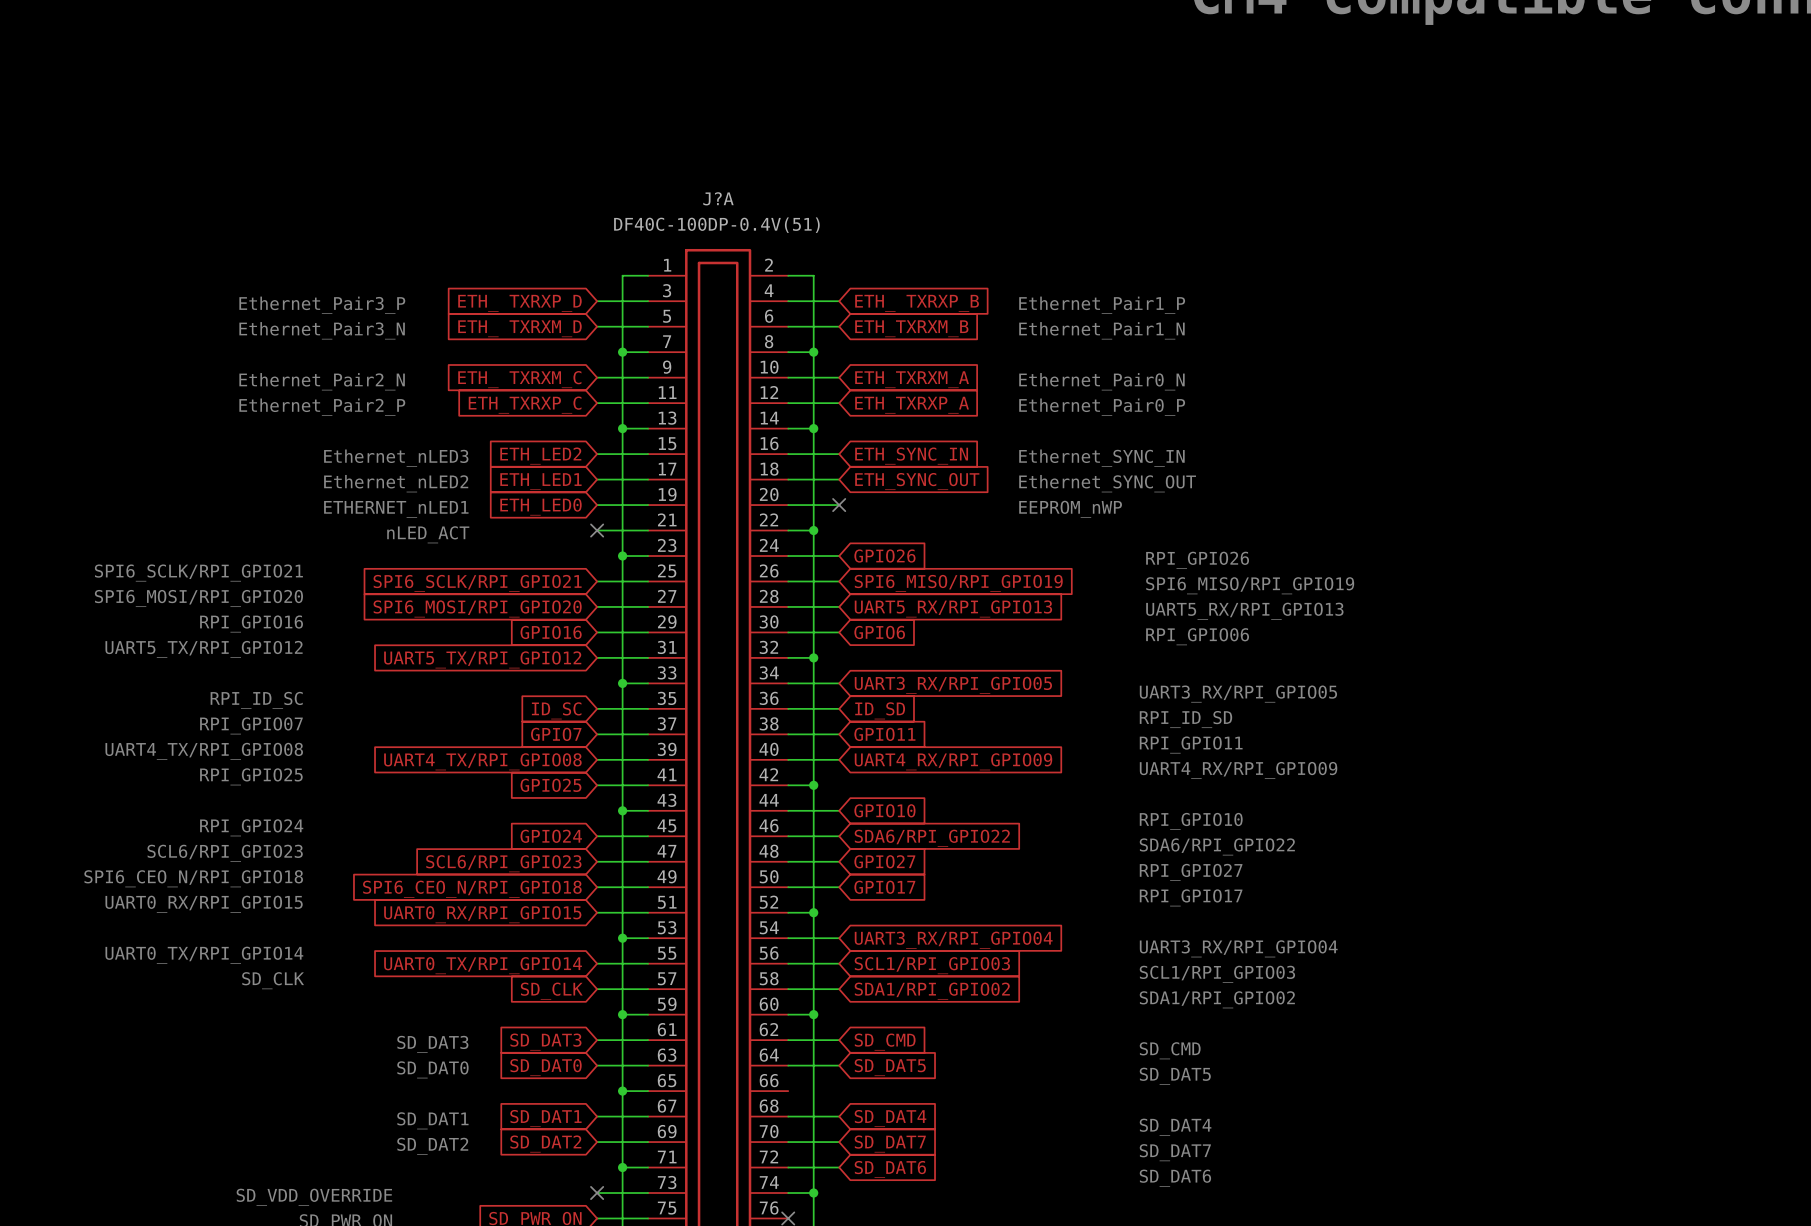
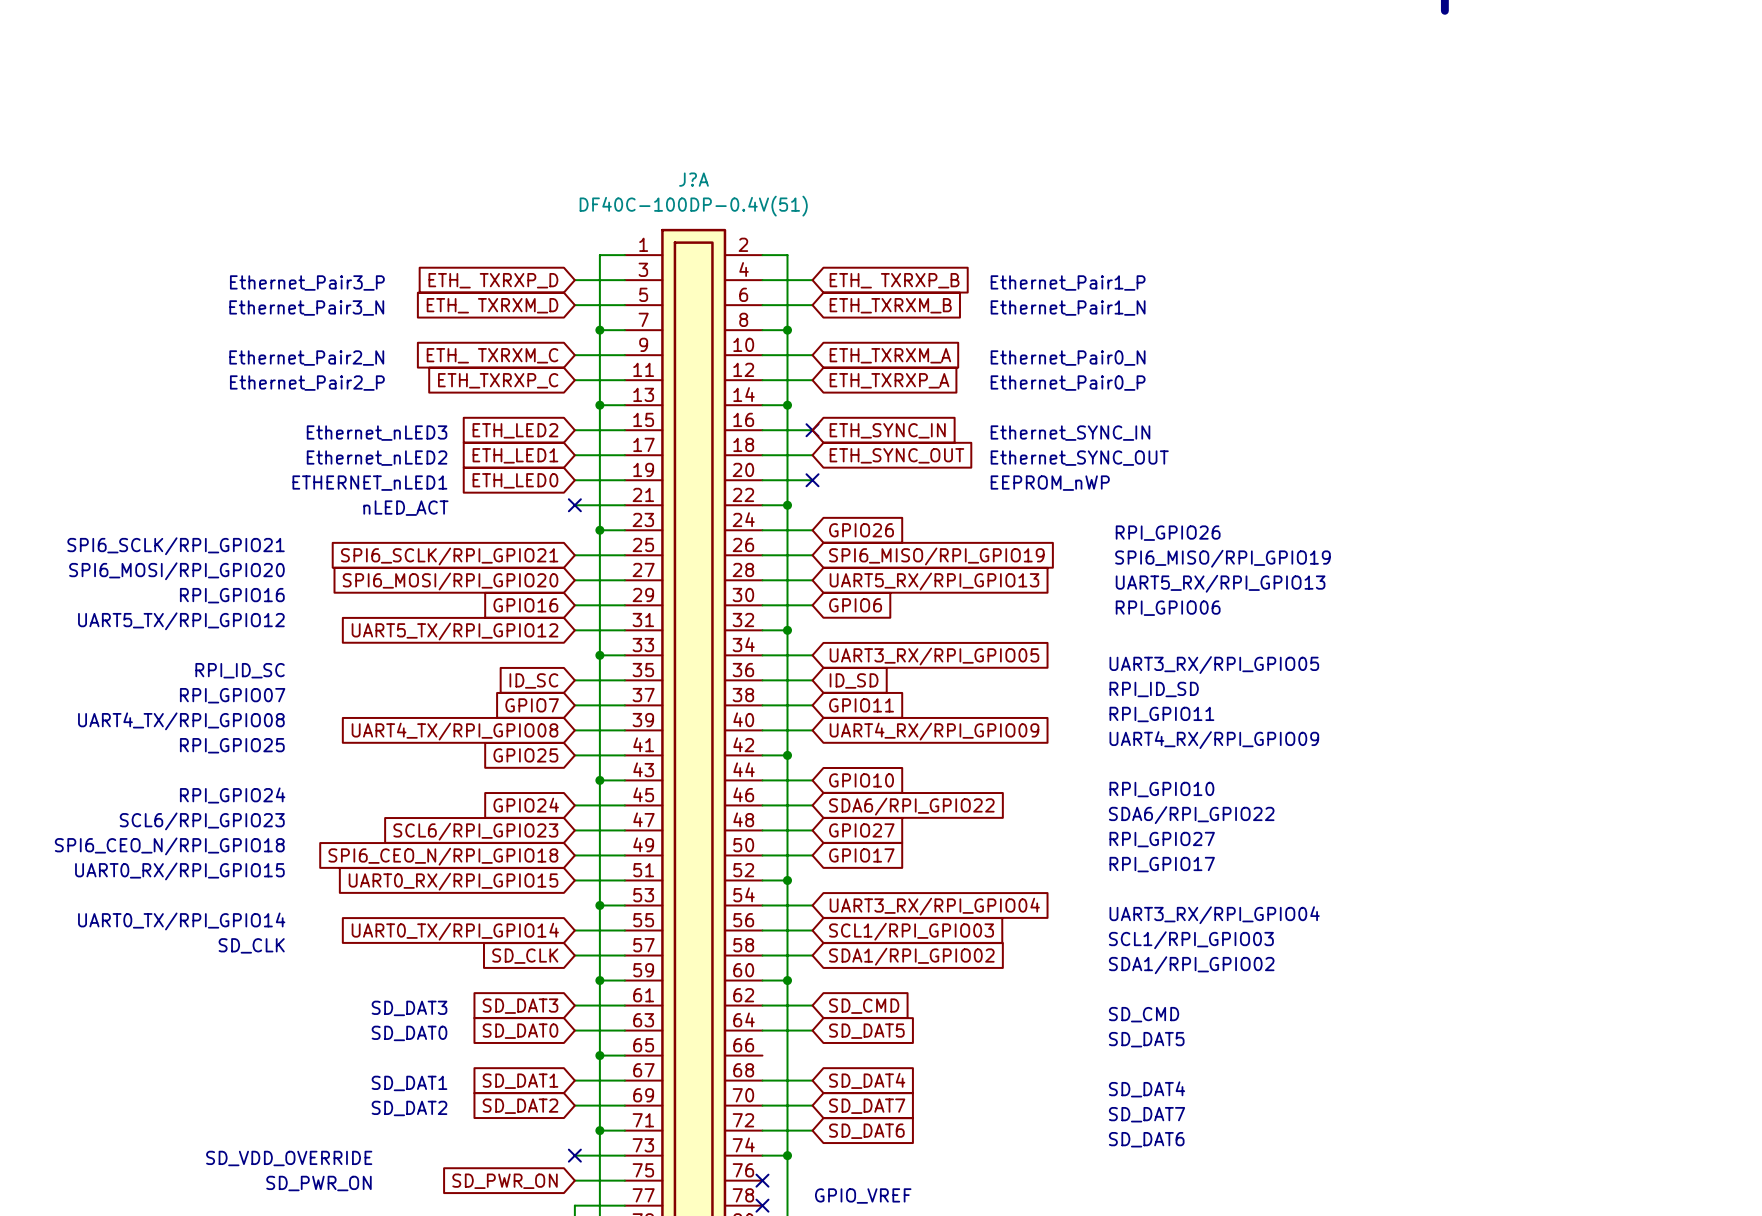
no-connect mark: none -> (812, 430)

